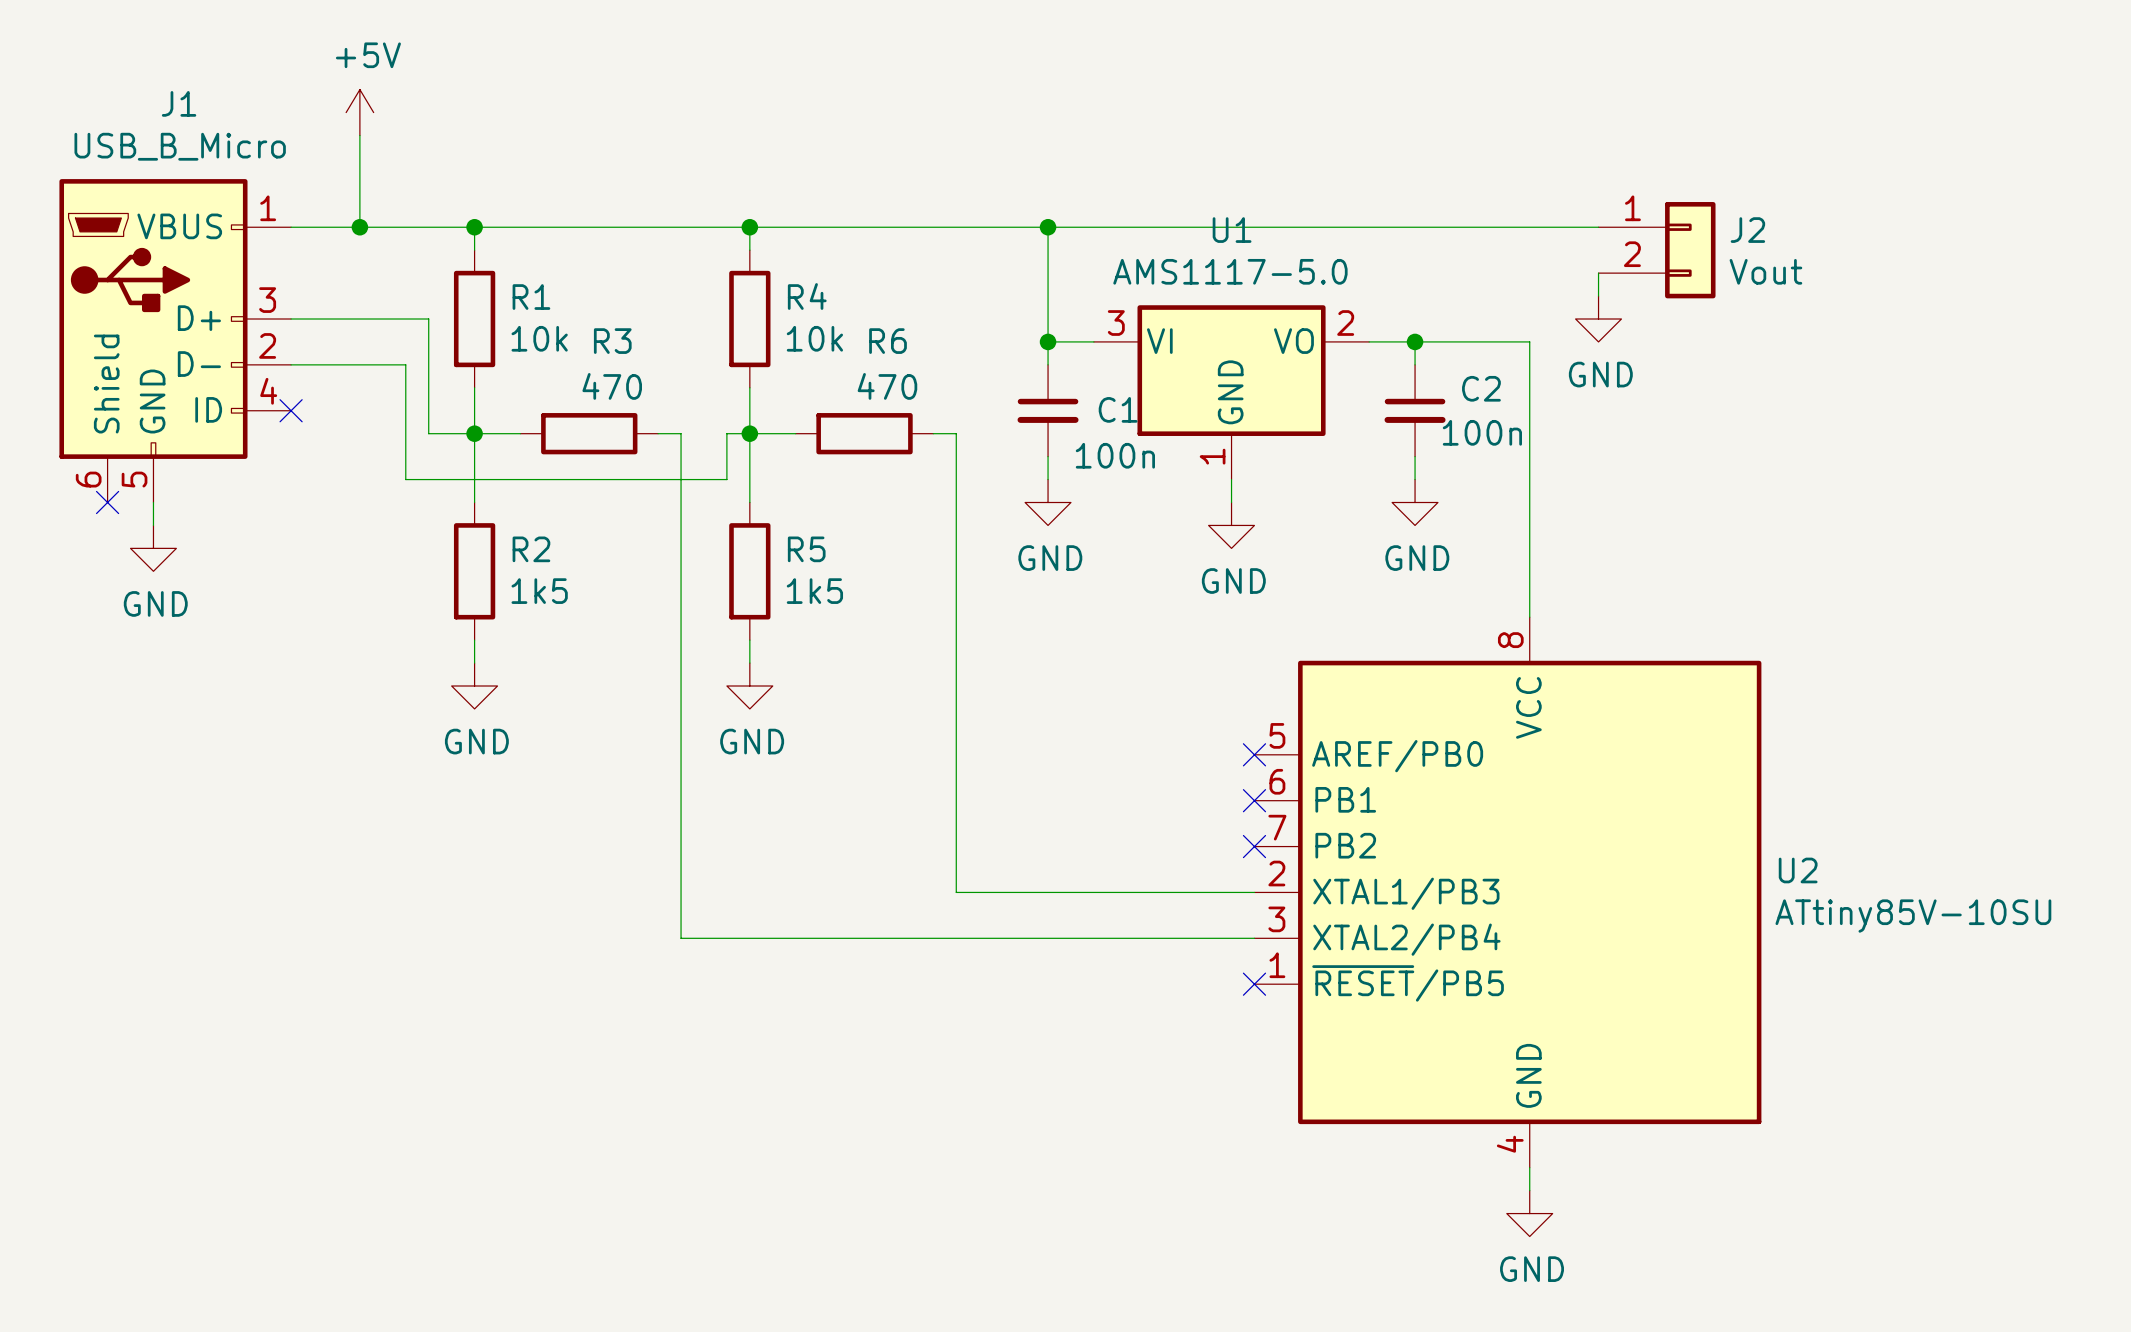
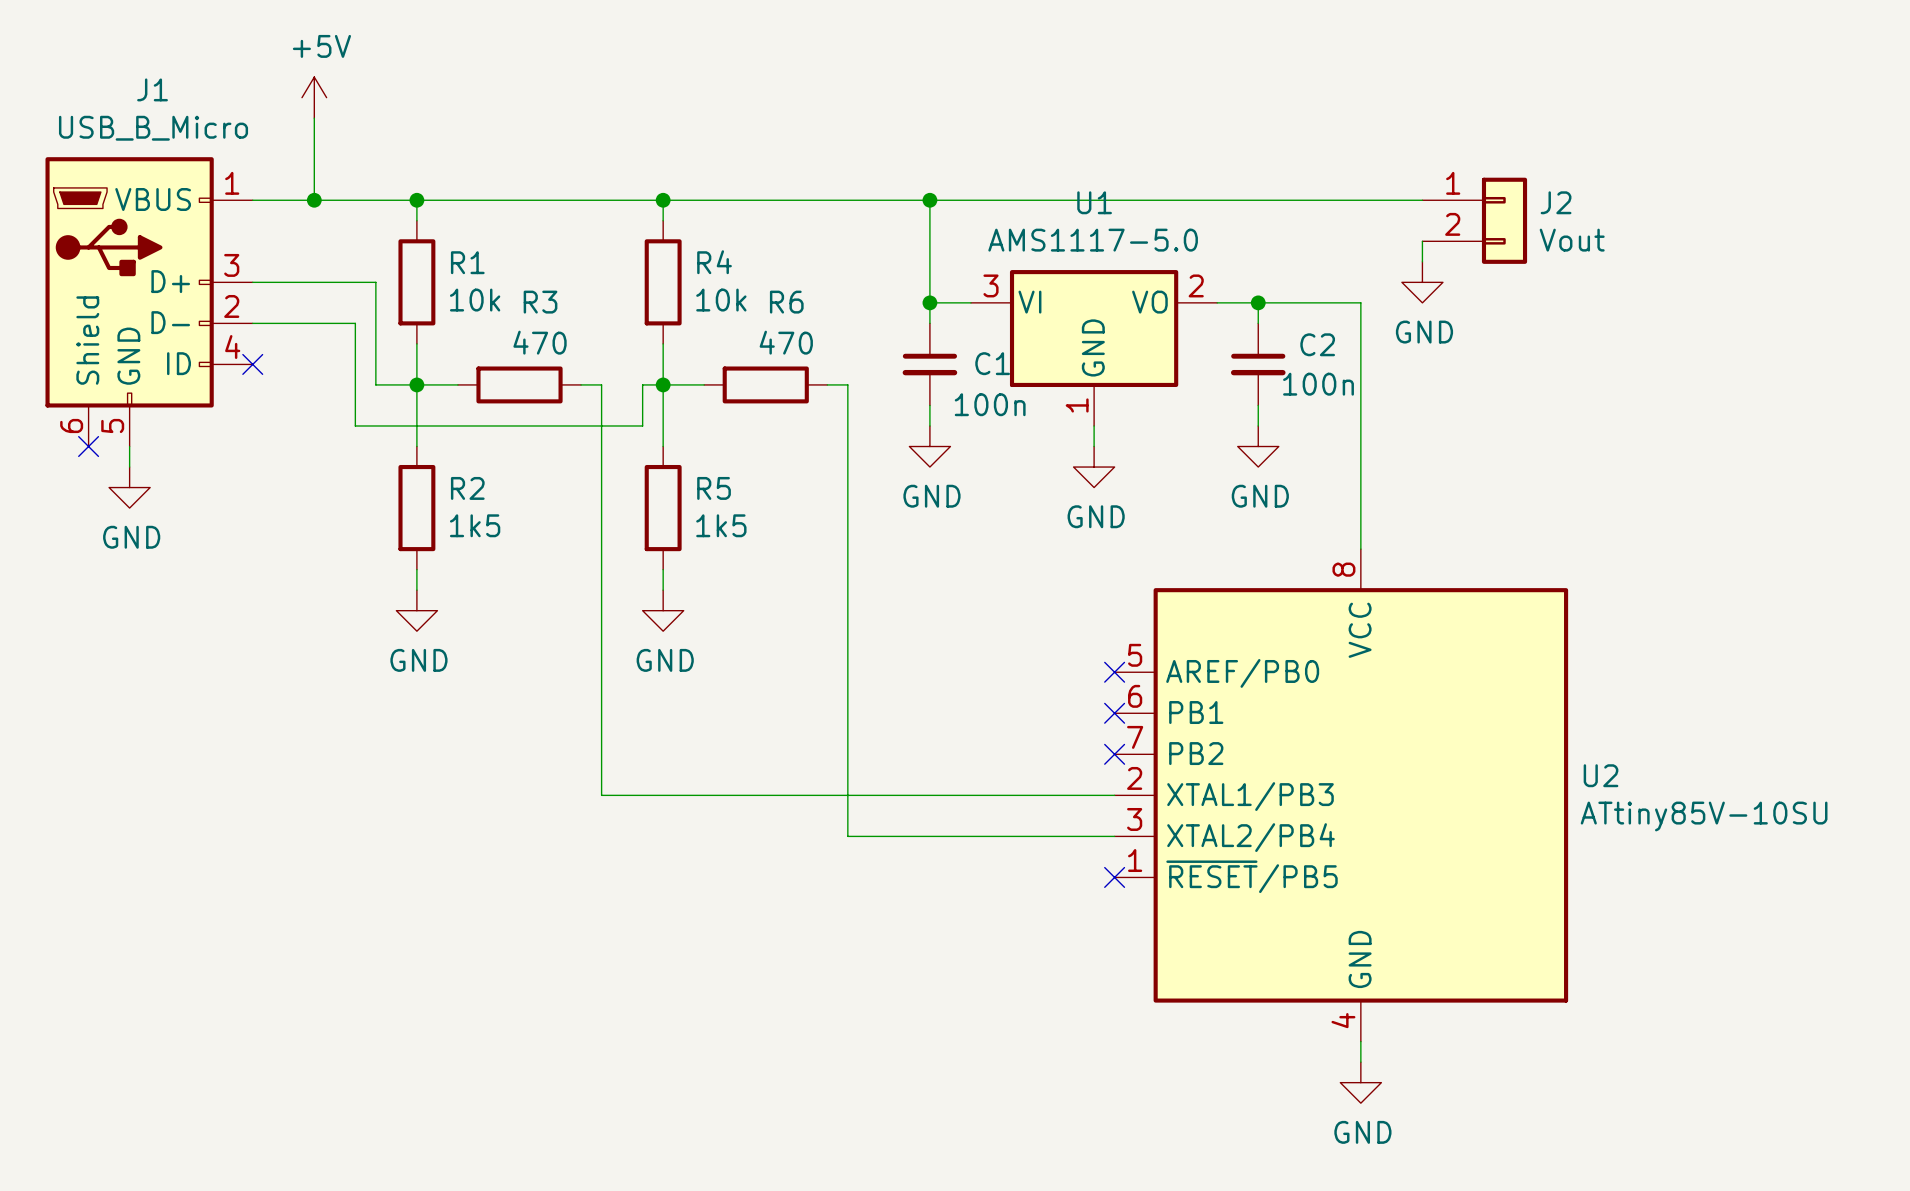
wire: (681, 892) (681, 938) (956, 938) -> (601, 795) (847, 795) (847, 836)

